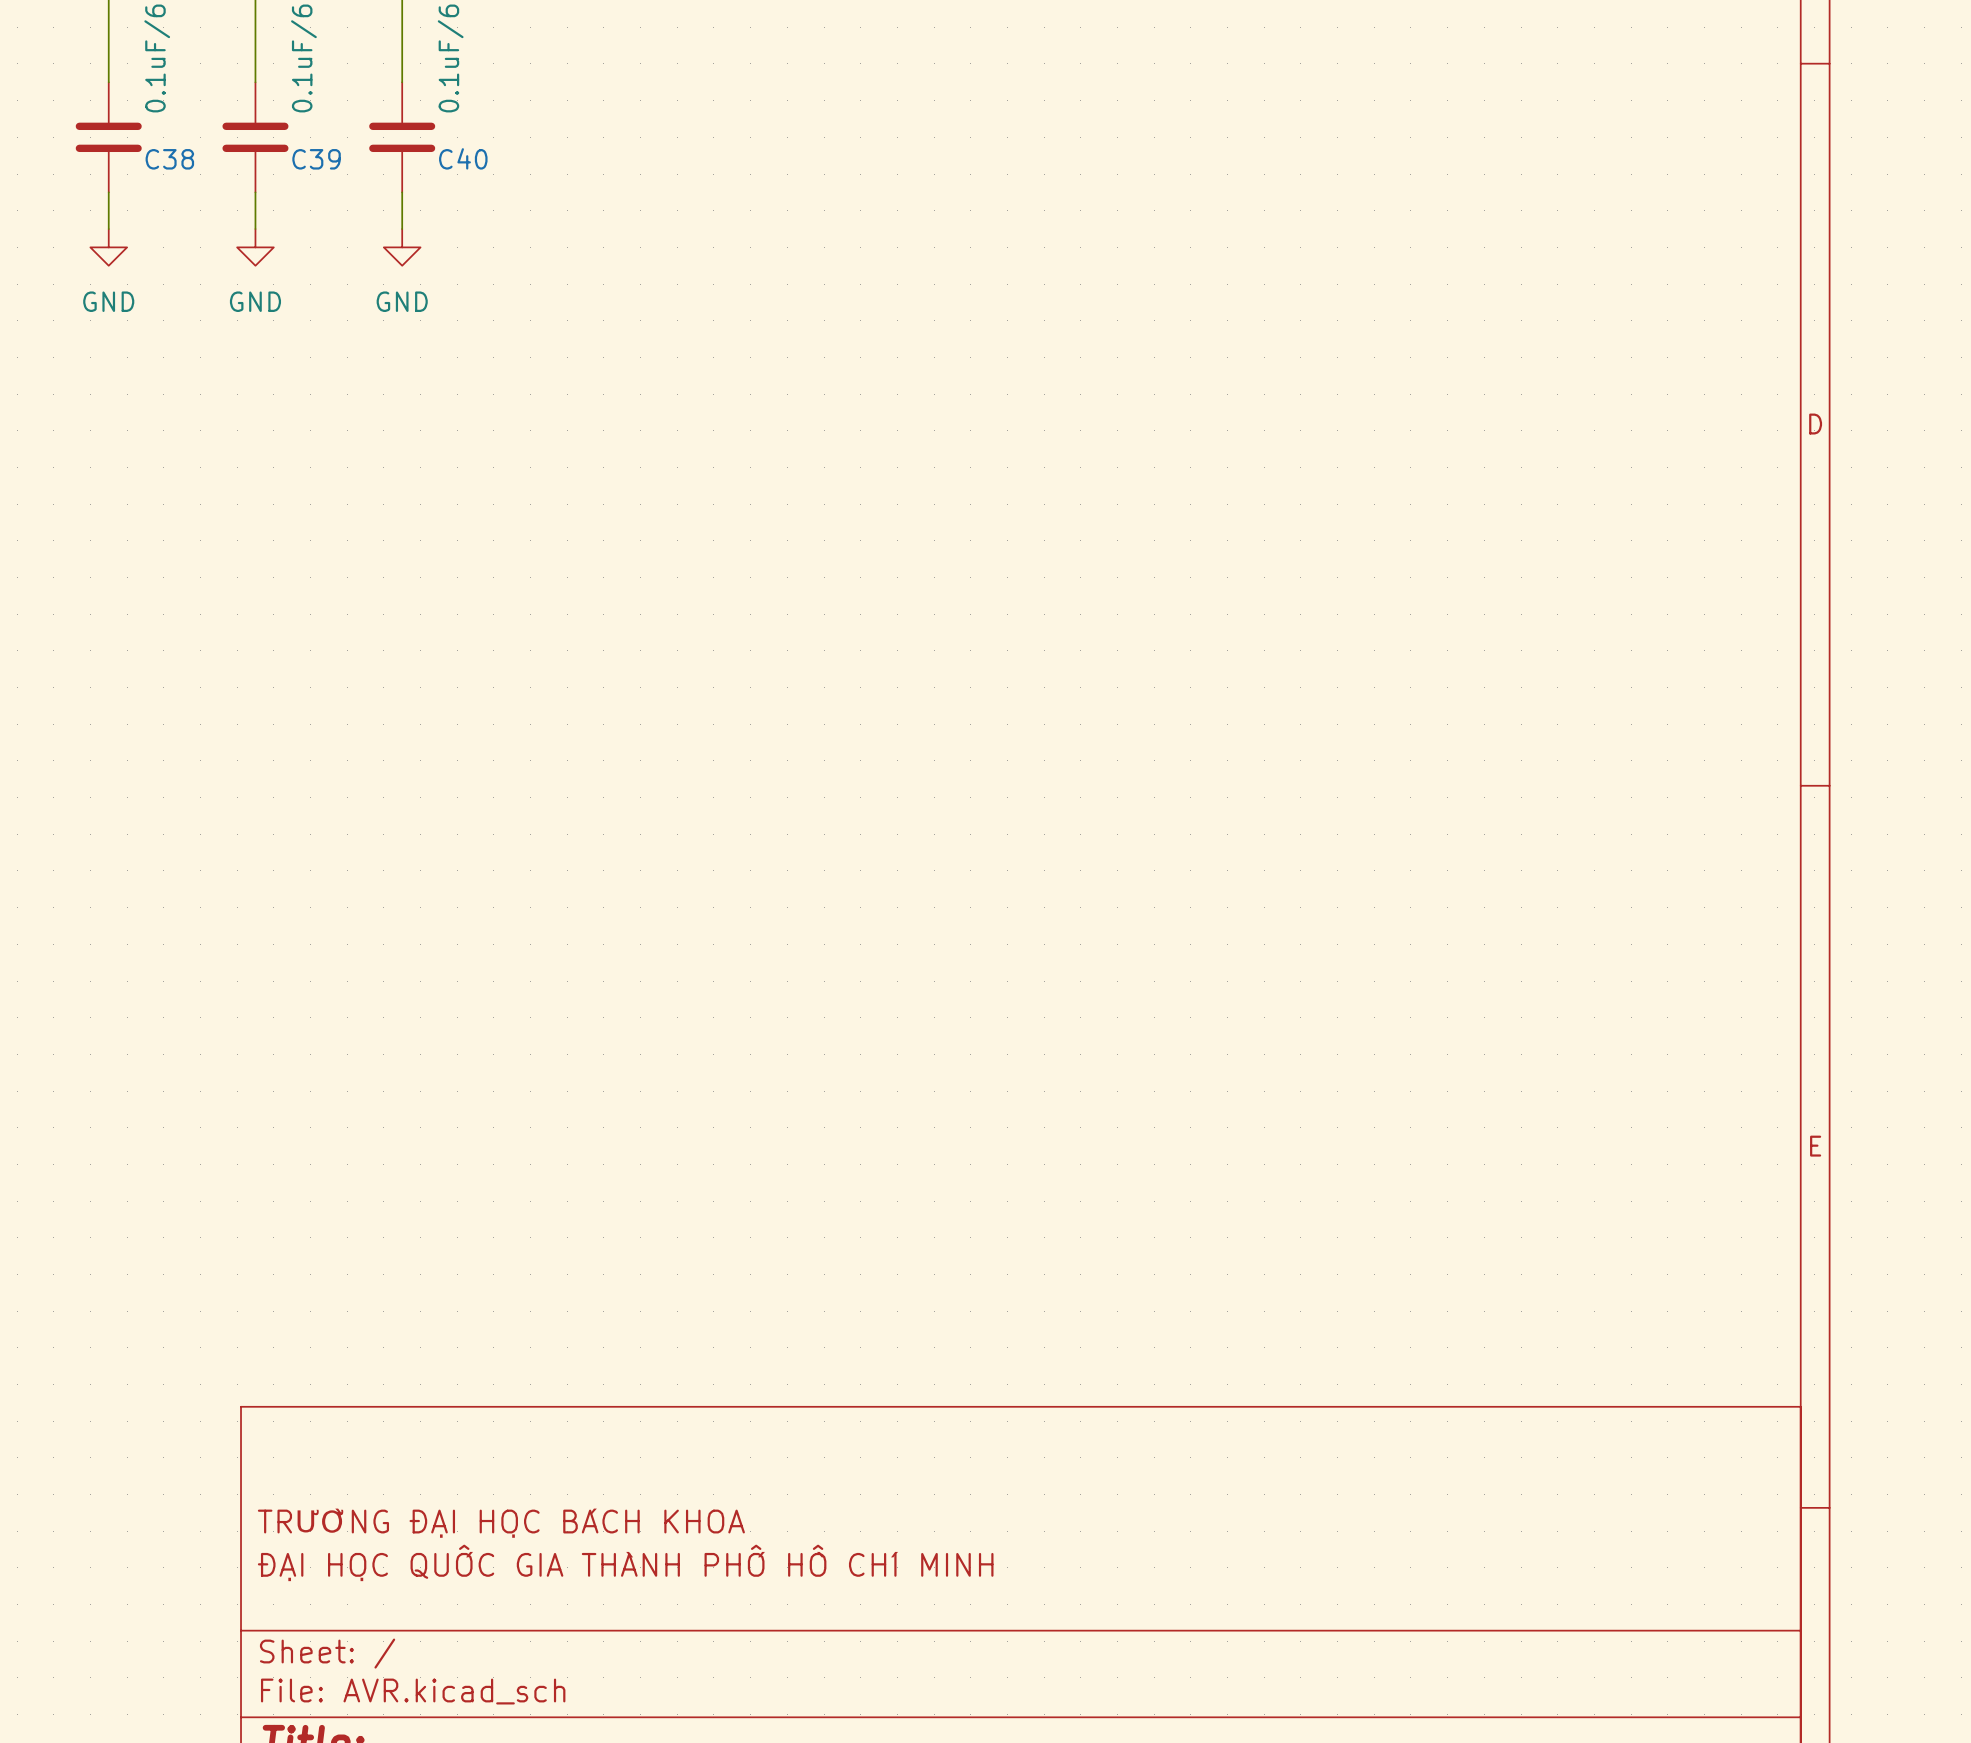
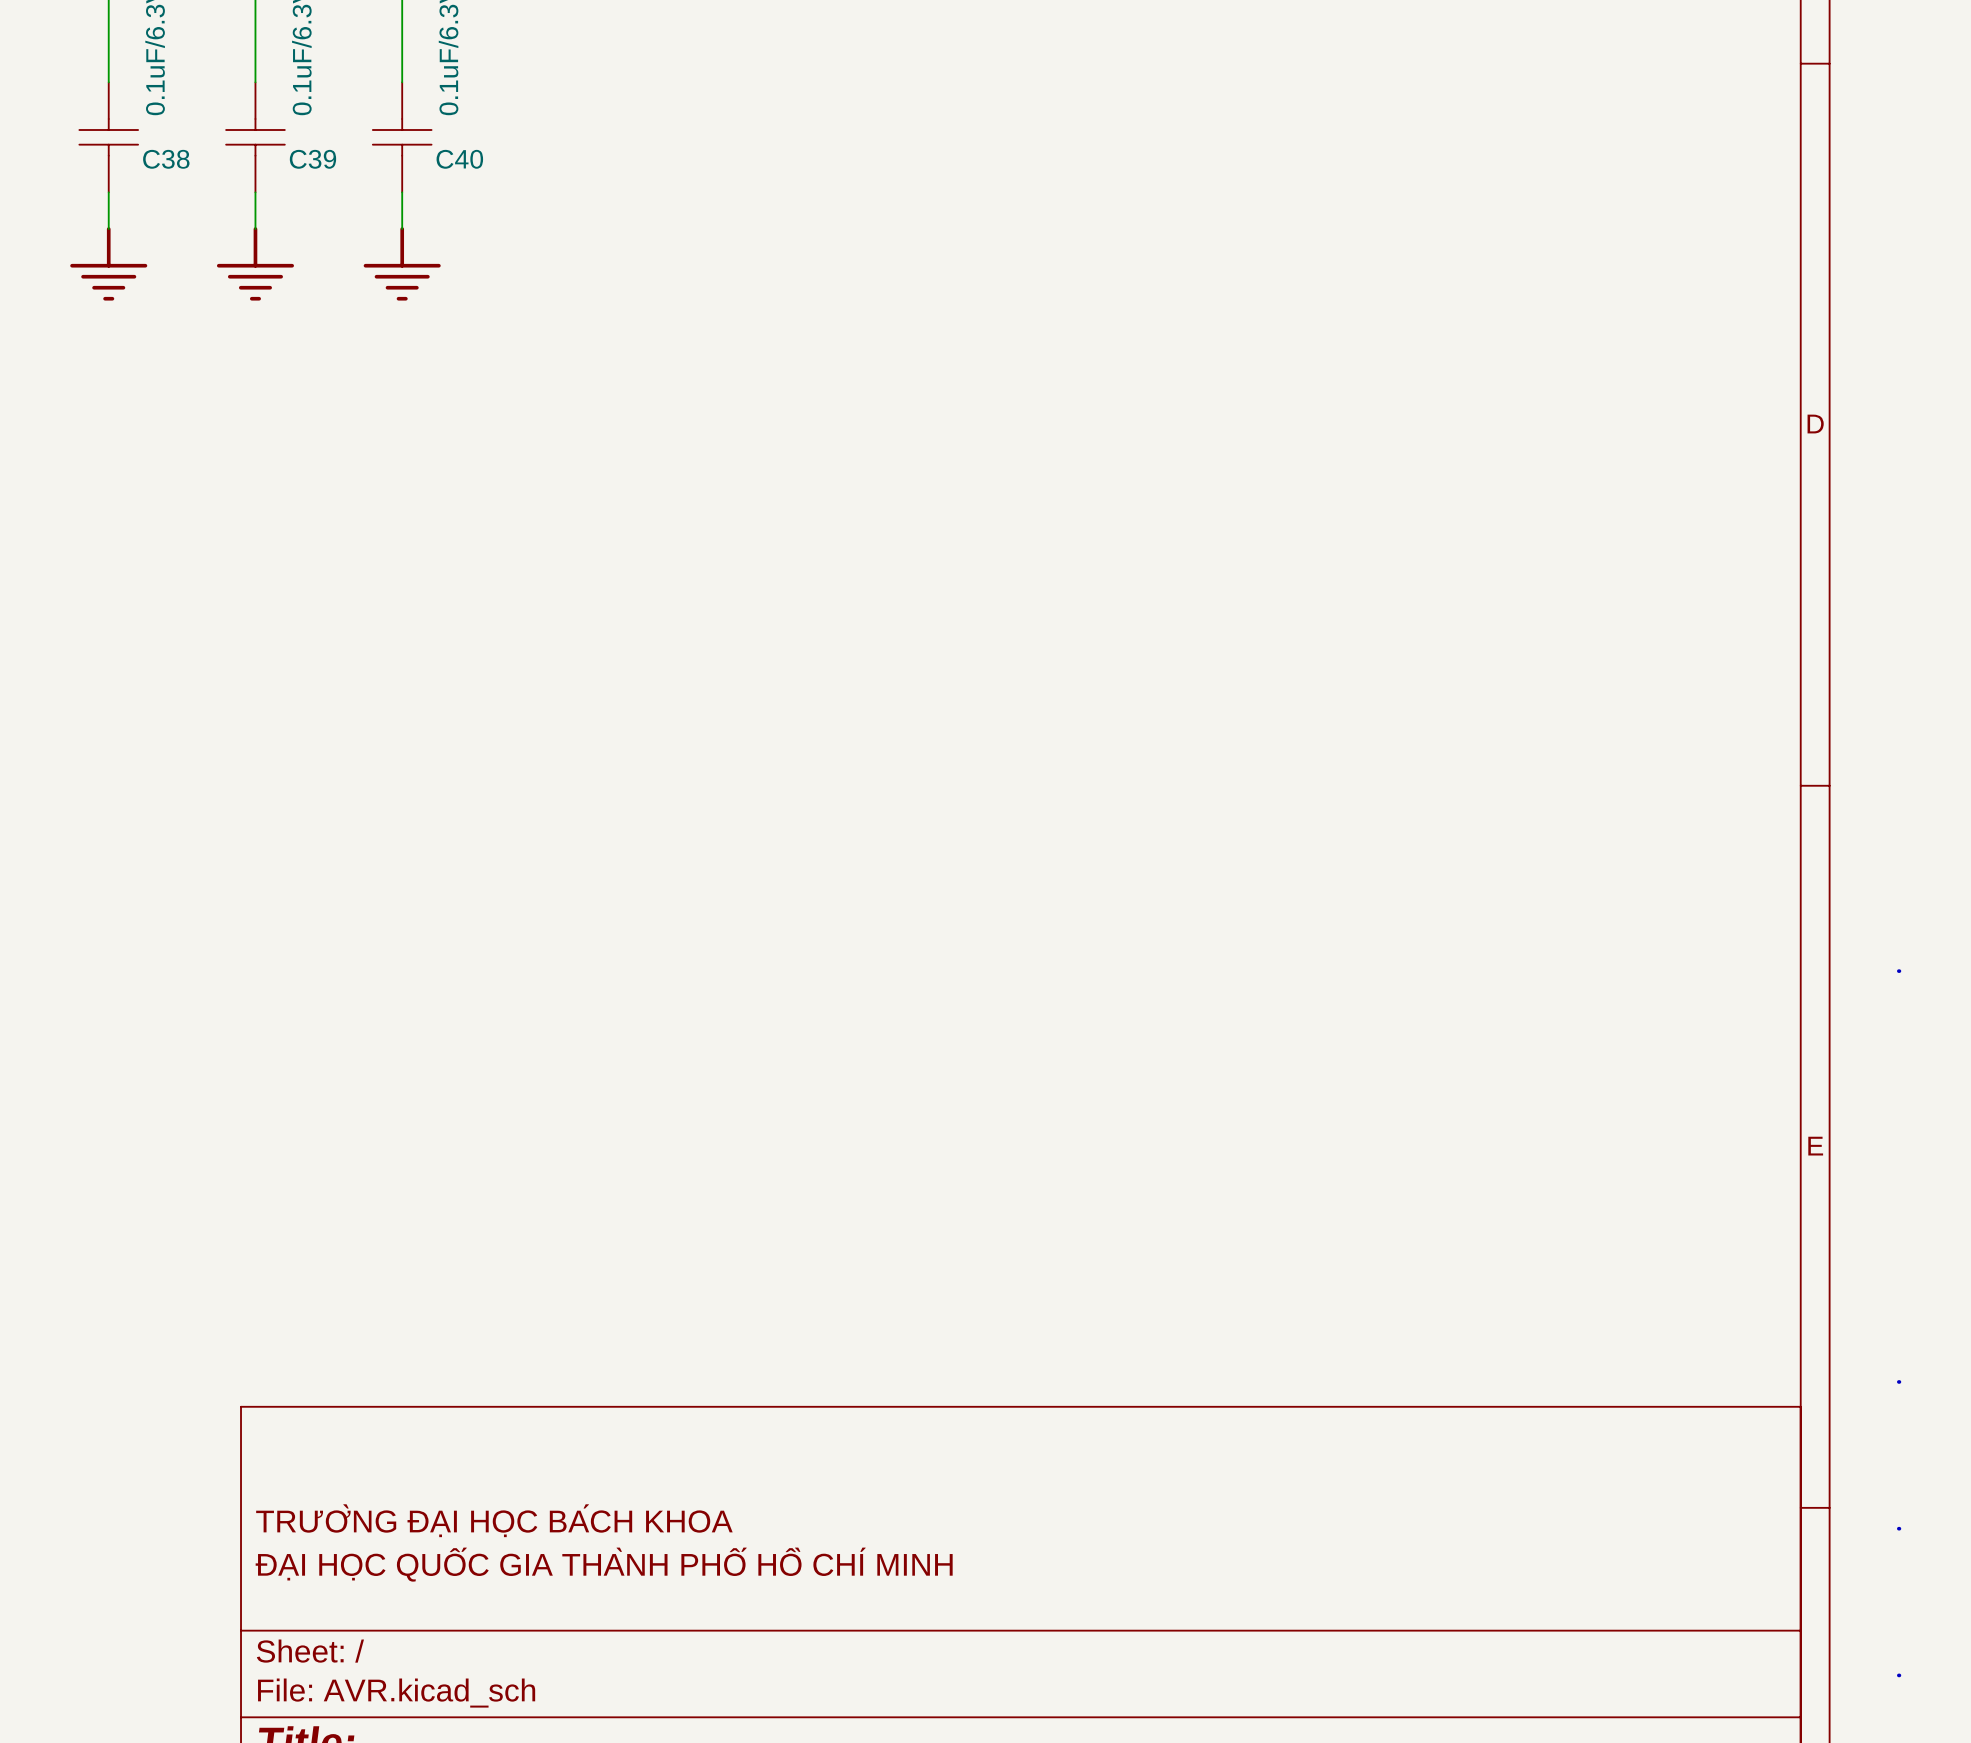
C38 symbol: [75, 82, 142, 193] -> [79, 82, 139, 193]
C39 symbol: [222, 82, 289, 193] -> [226, 82, 285, 193]
C40 symbol: [369, 82, 436, 193] -> [372, 82, 432, 193]
power symbol: GND (108, 247) -> none
power symbol: GND (255, 247) -> none
power symbol: GND (402, 247) -> none
power symbol: none -> (108, 263)
power symbol: none -> (255, 263)
power symbol: none -> (402, 263)
line: none -> (1898, 971) (1899, 971)
line: none -> (1898, 1381) (1899, 1381)
line: none -> (1898, 1528) (1899, 1528)
line: none -> (1898, 1675) (1899, 1675)

